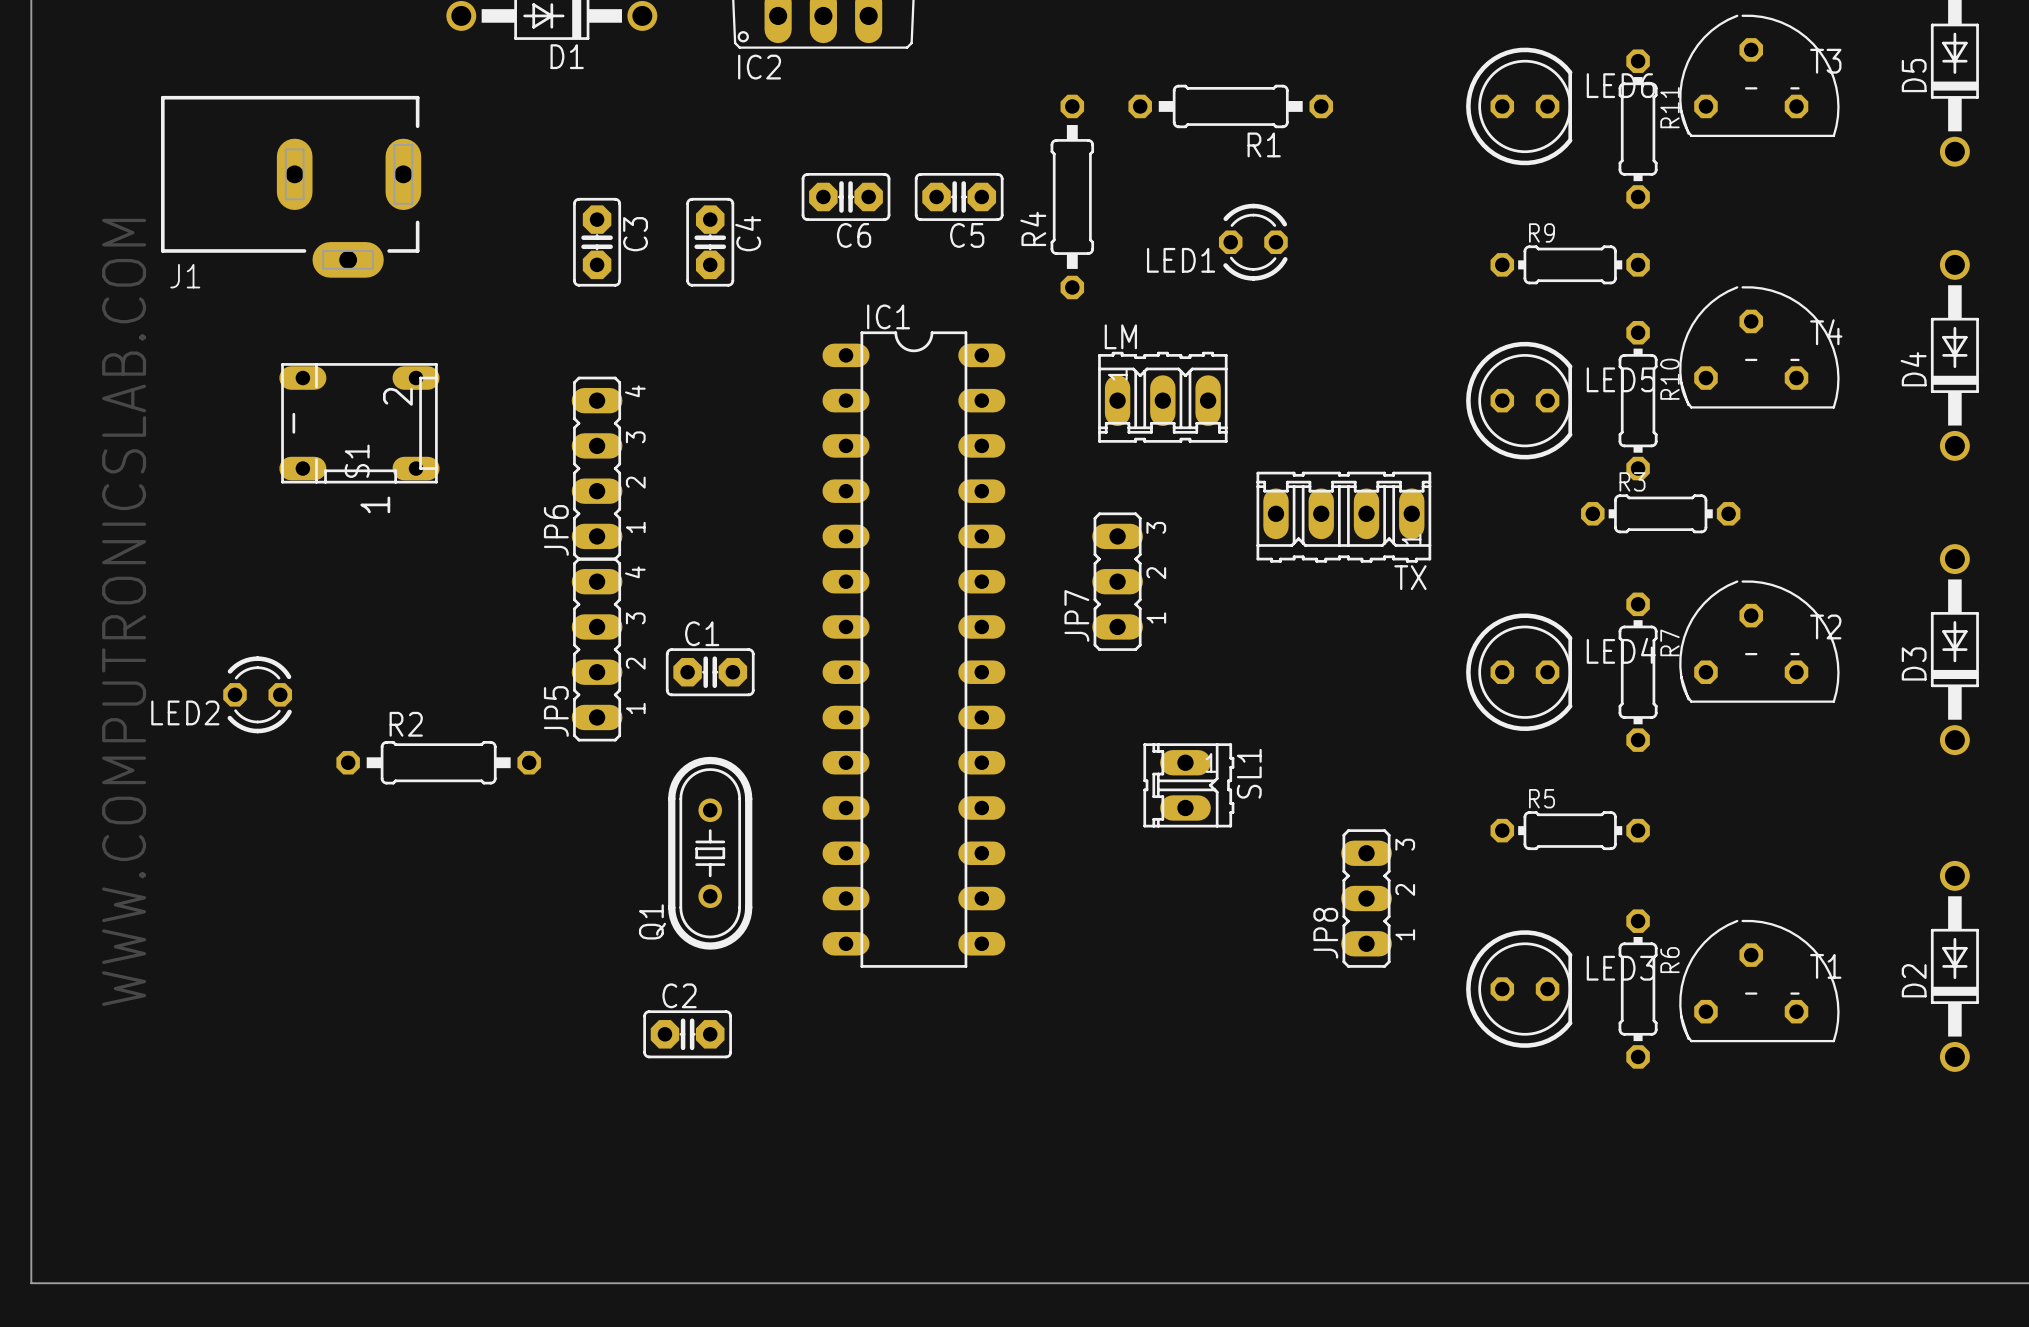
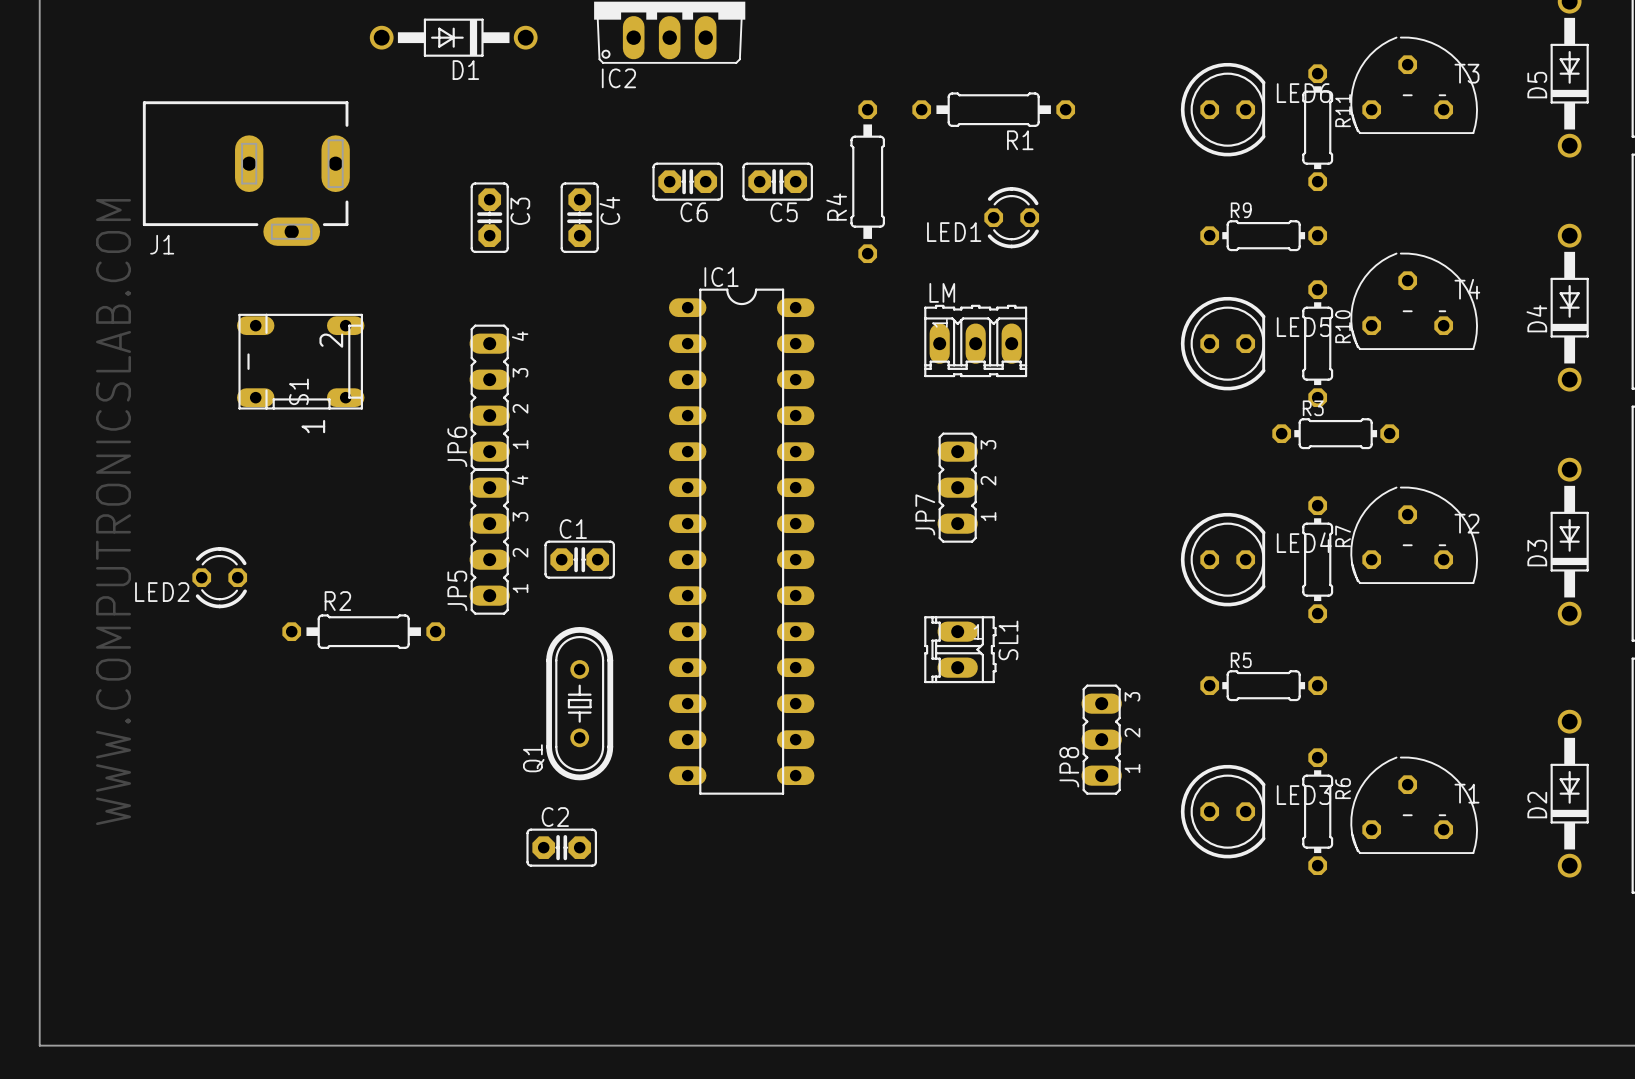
LM position: (1162, 397) -> (975, 340)
TX: (1343, 517) -> none
JP7 position: (1117, 581) -> (957, 487)

